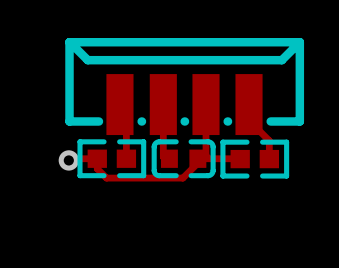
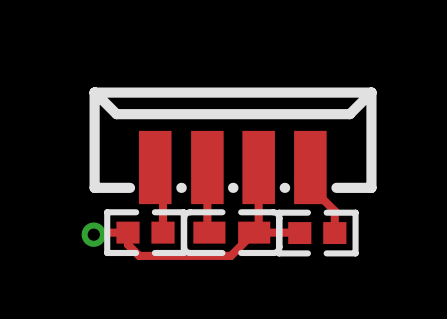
part footprint: [151, 139, 216, 179] -> [181, 209, 283, 257]

